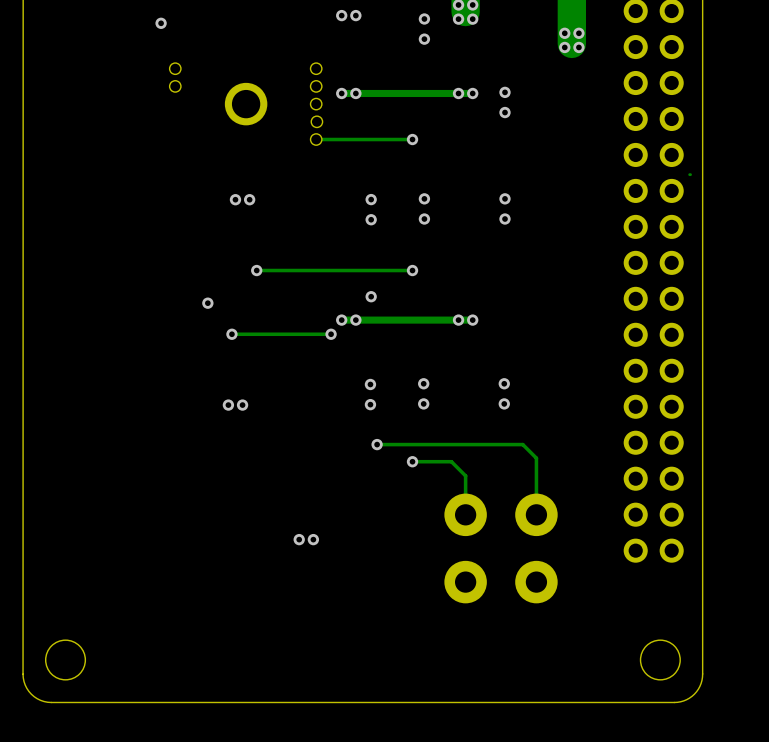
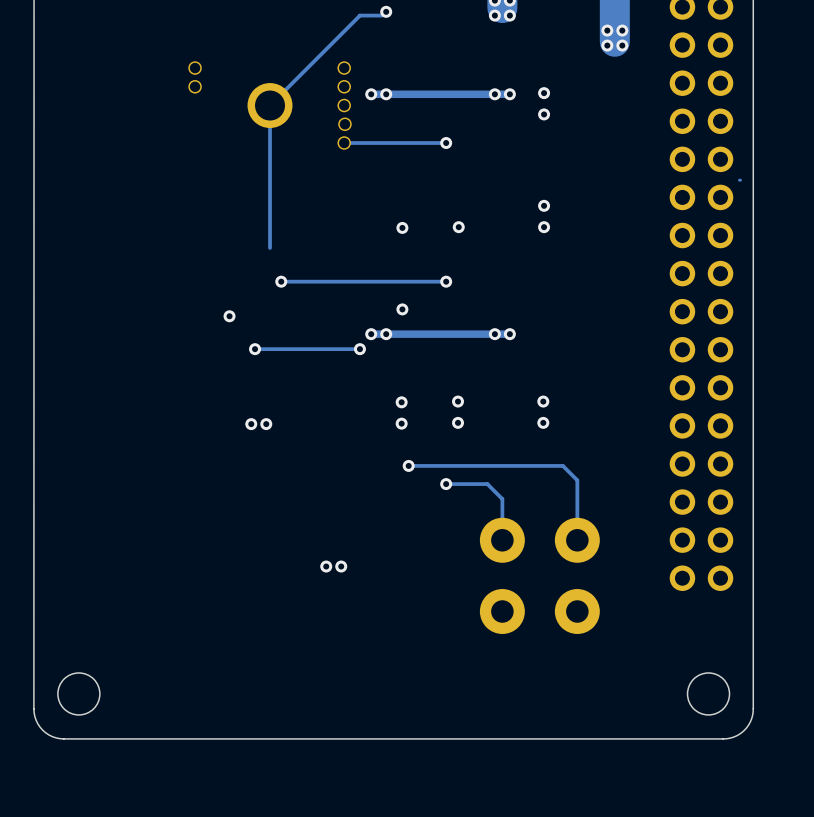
via: (341, 15) -> none
via: (424, 18) -> none
track: none -> (382, 15) (359, 15) (270, 105) (270, 247)
via: (161, 23) -> none
via: (424, 39) -> none
via: (424, 198) -> none
via: (235, 199) -> none
via: (249, 199) -> none
via: (371, 199) -> none

